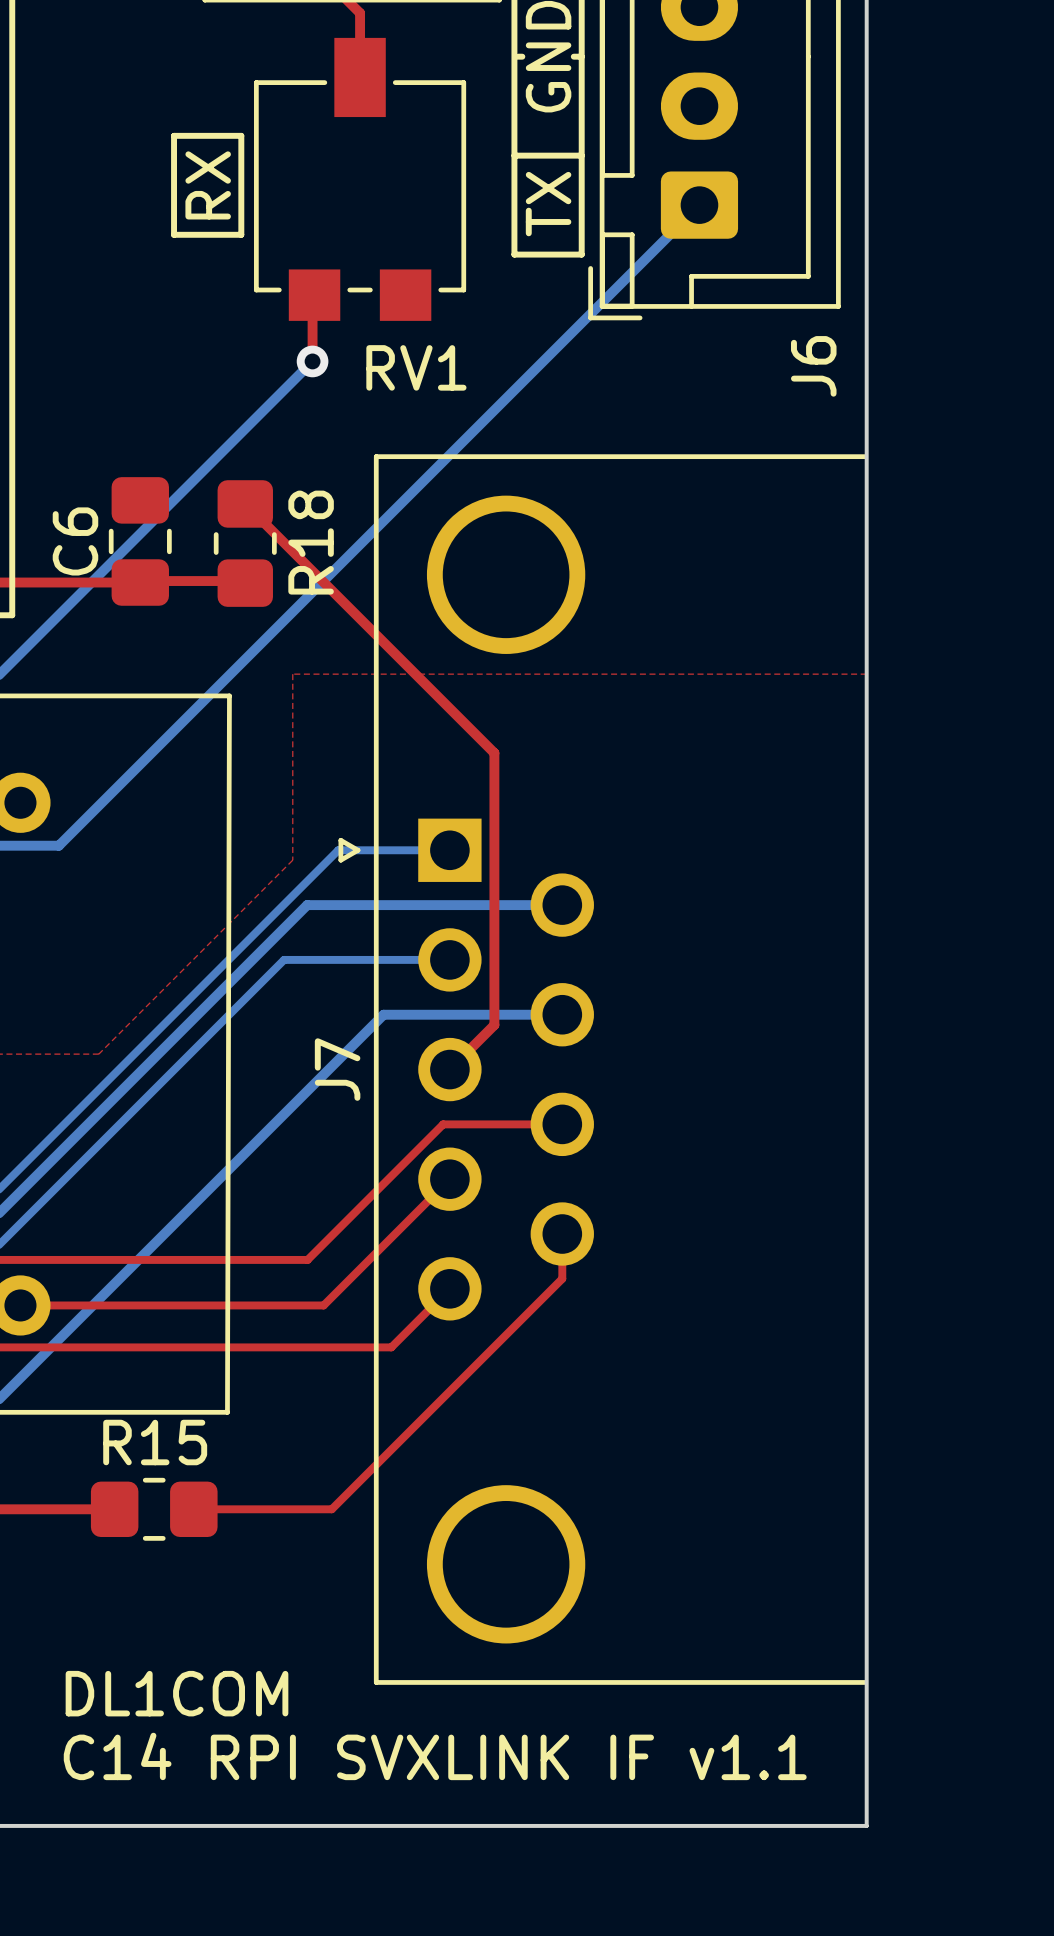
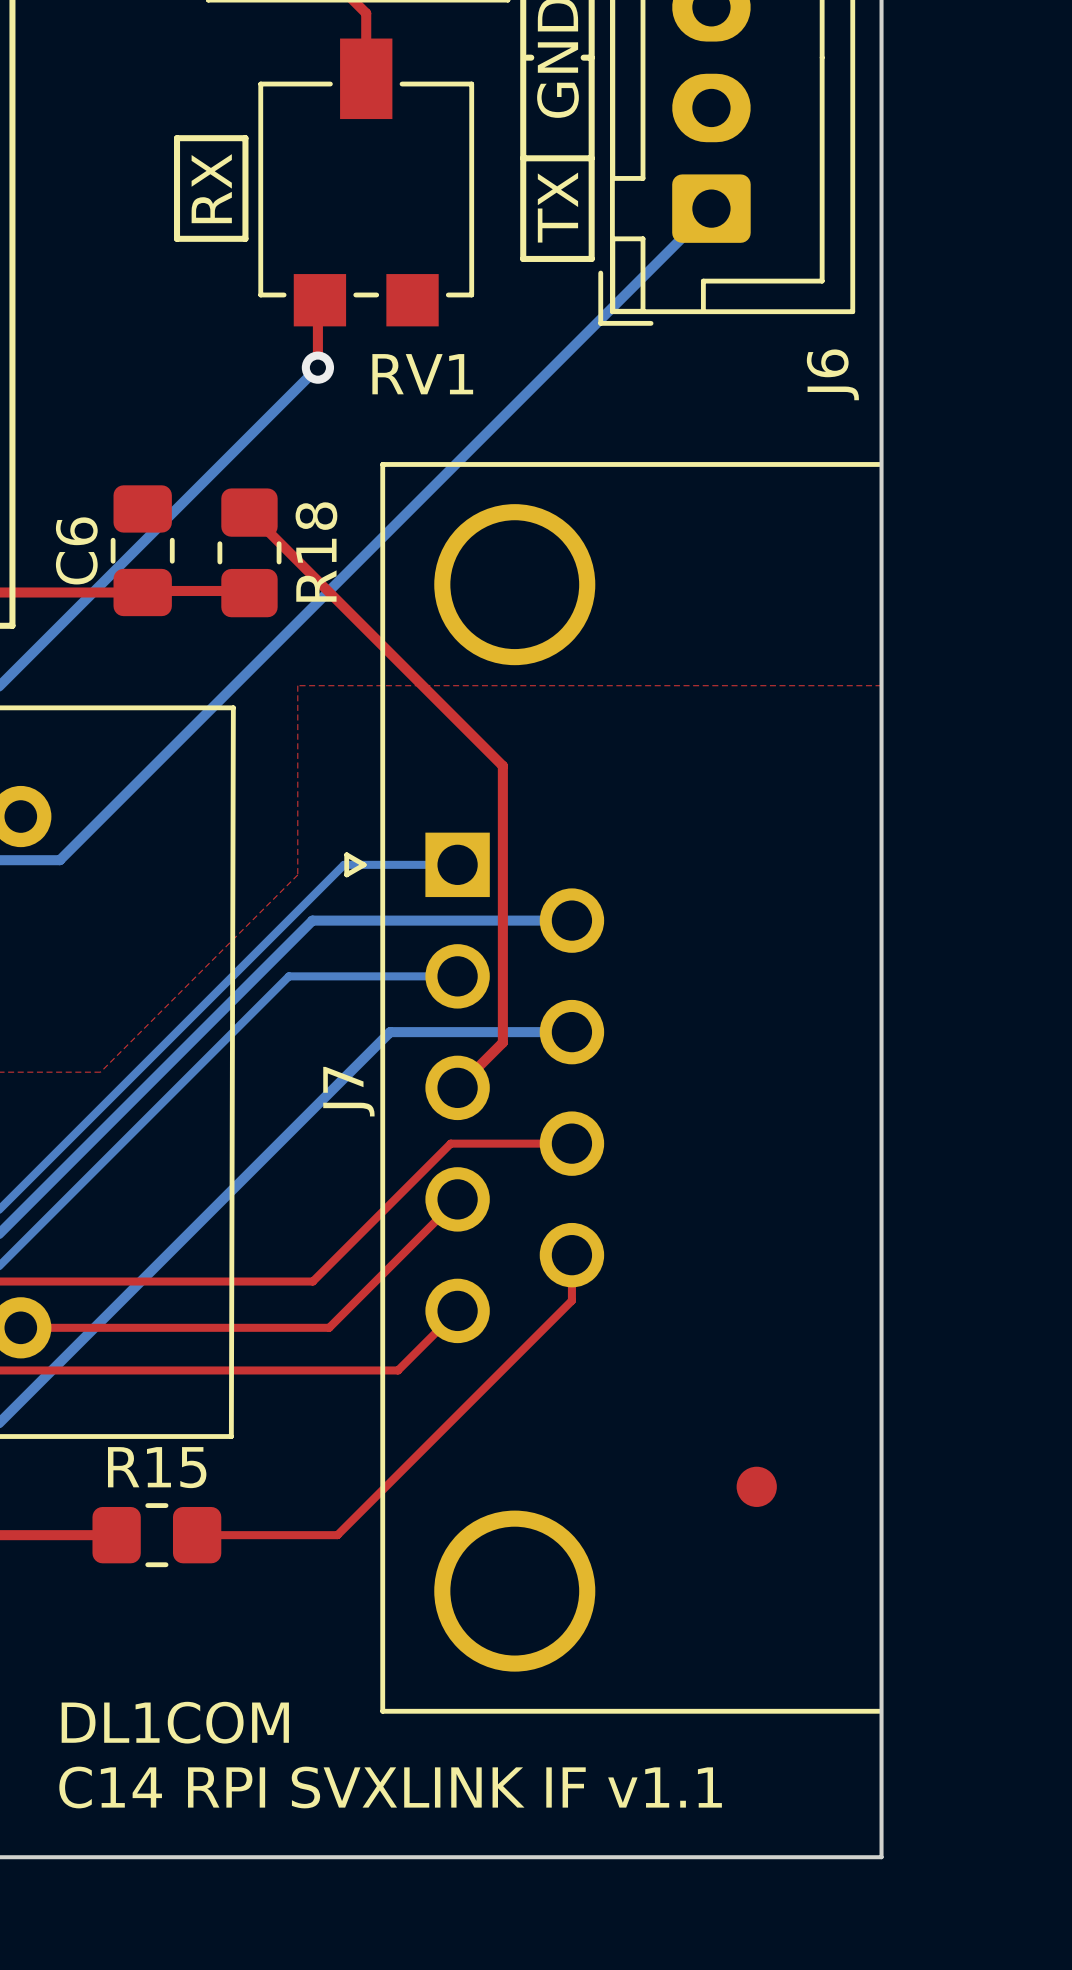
part: none -> (756, 1486)

